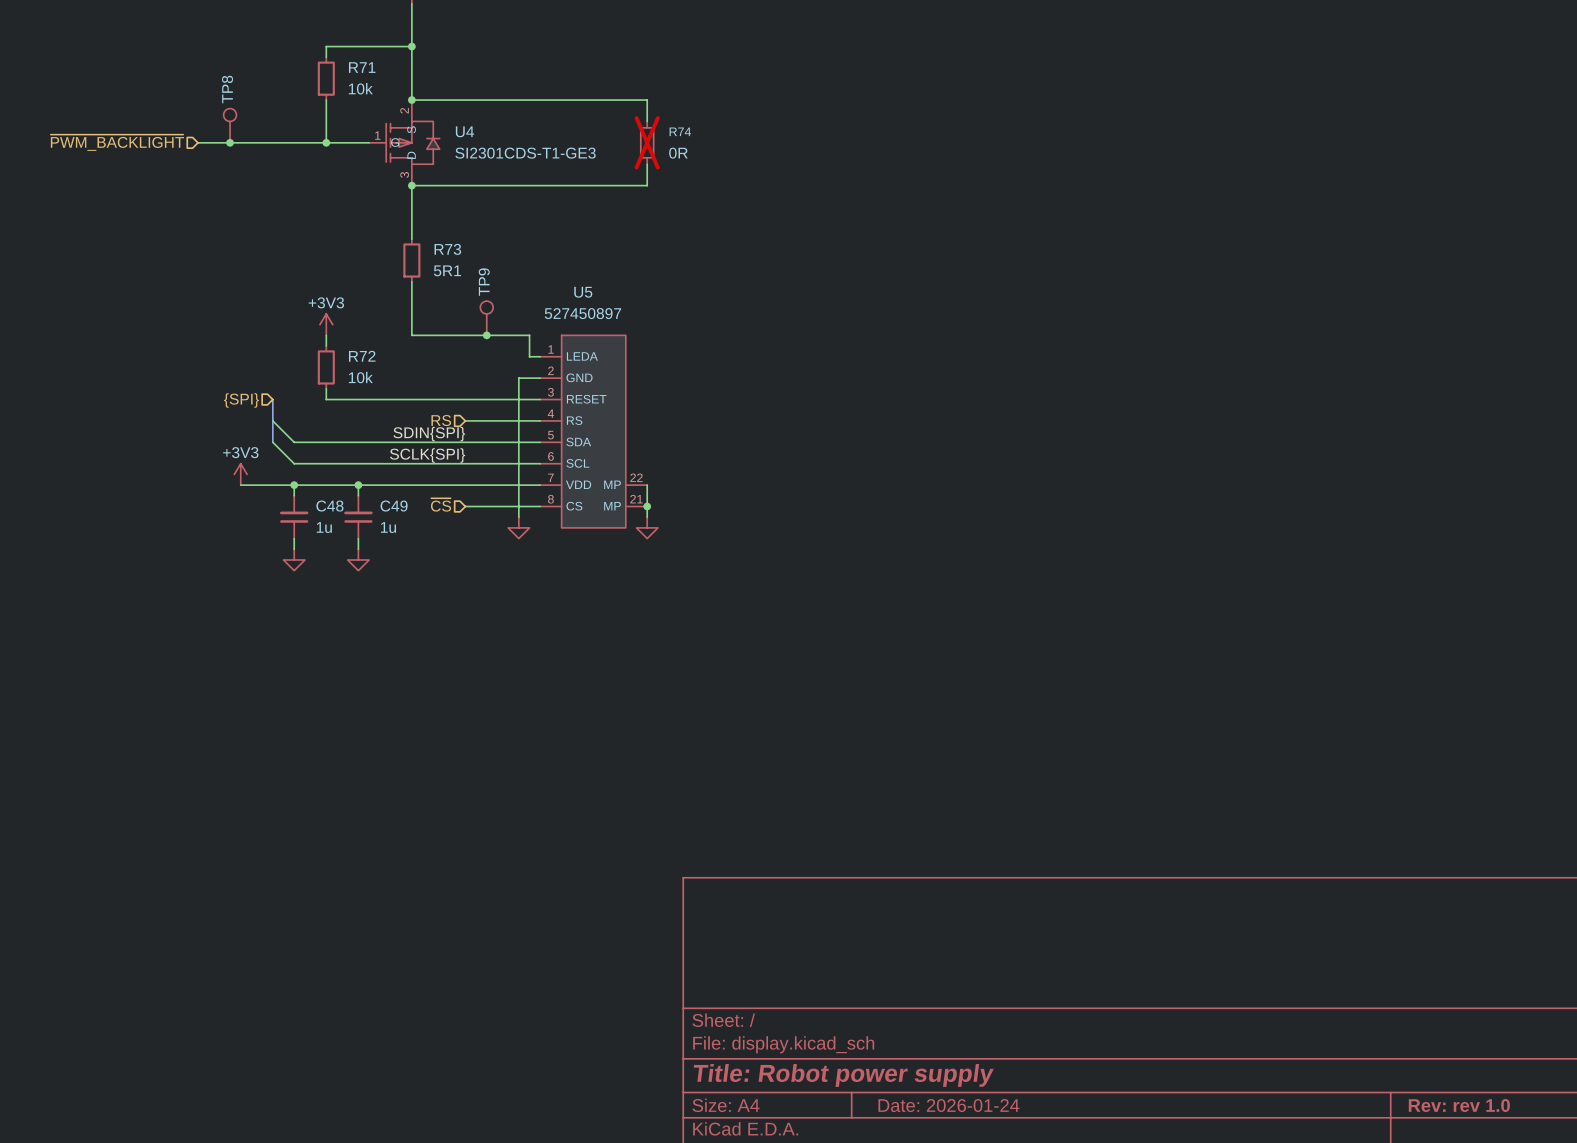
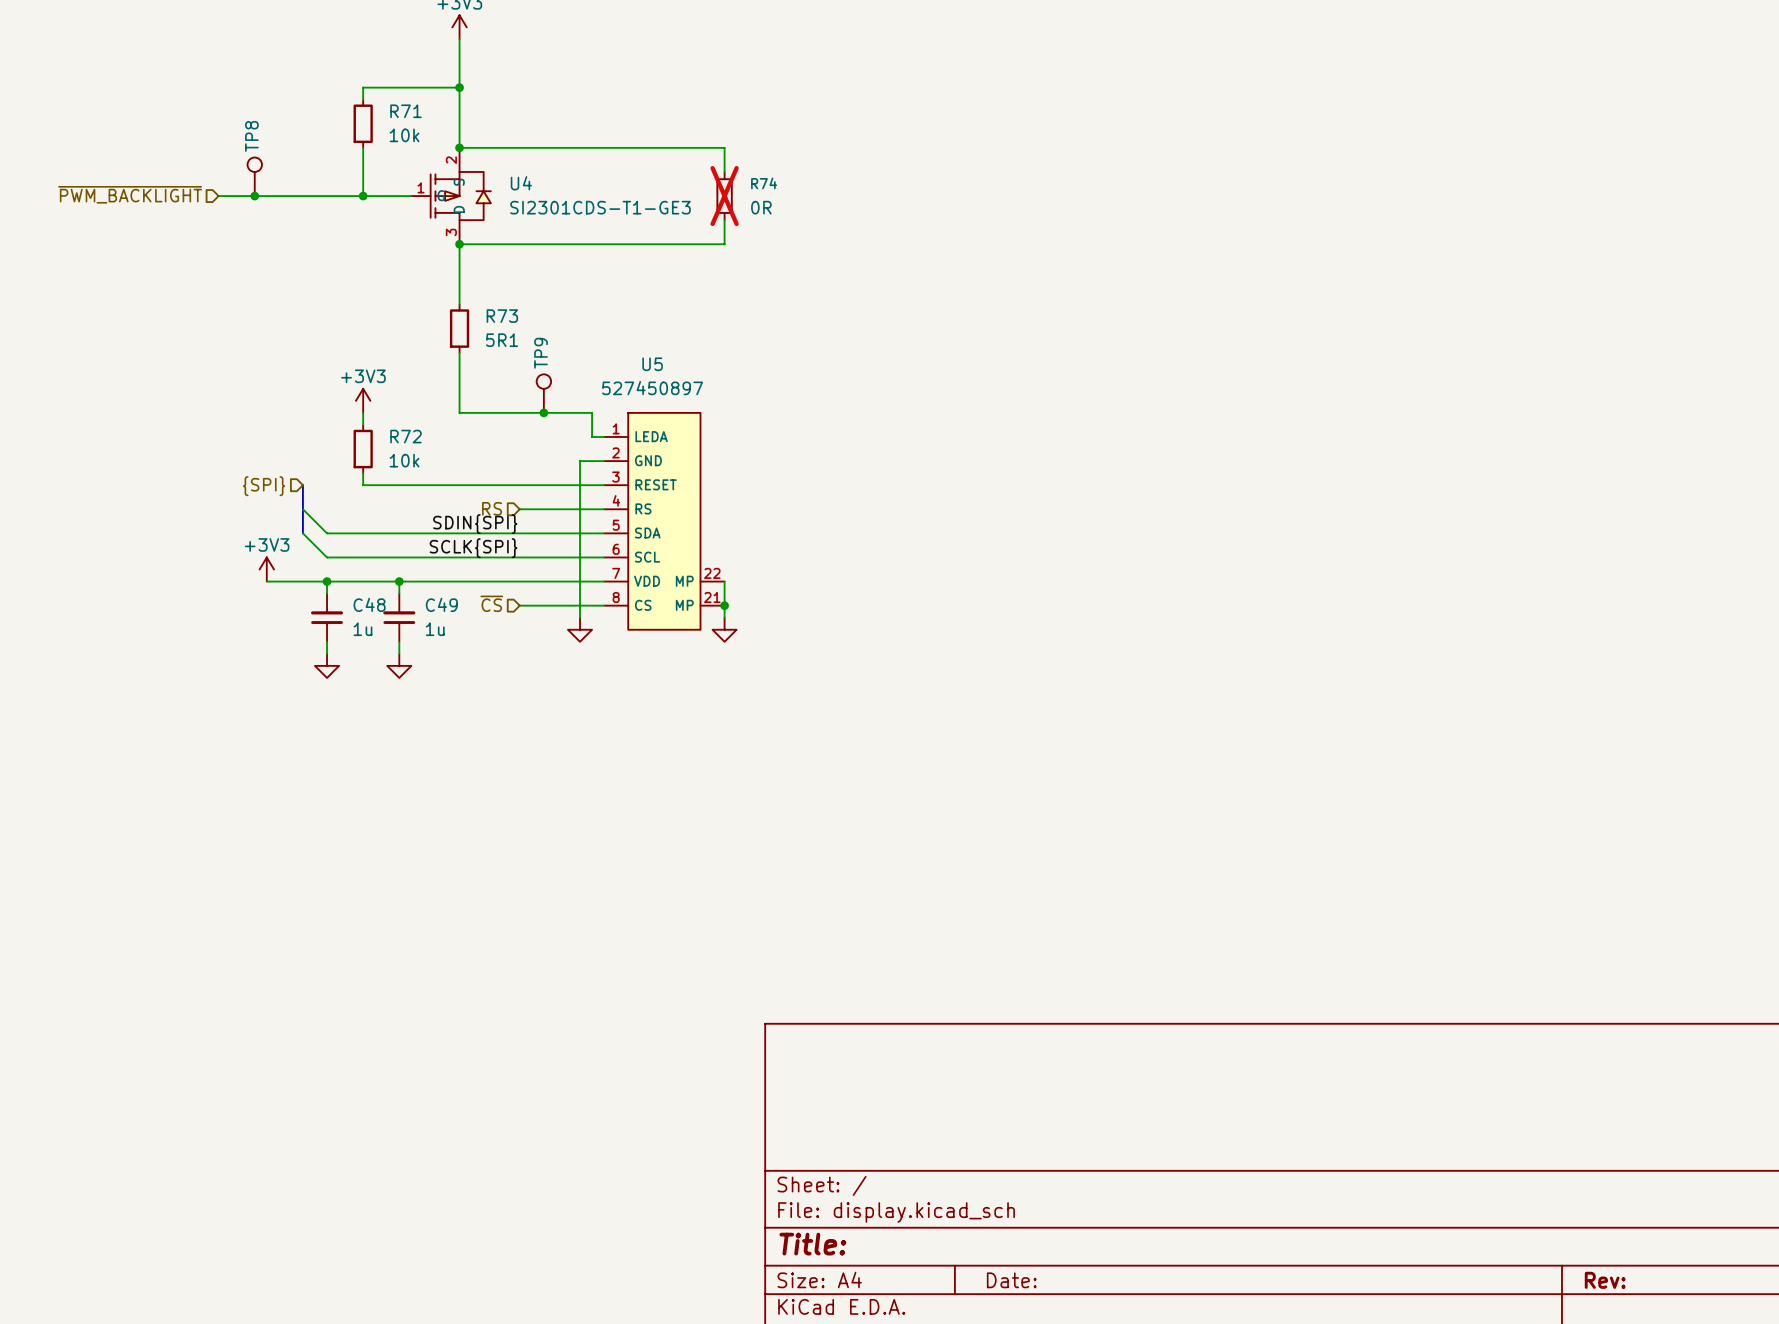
title block: Title: Robot power supply (843, 1075) -> Title: (812, 1244)
title block: Date: 2026-01-24 (948, 1105) -> Date: (1011, 1280)
title block: Rev: rev 1.0 (1459, 1105) -> Rev: (1605, 1280)

